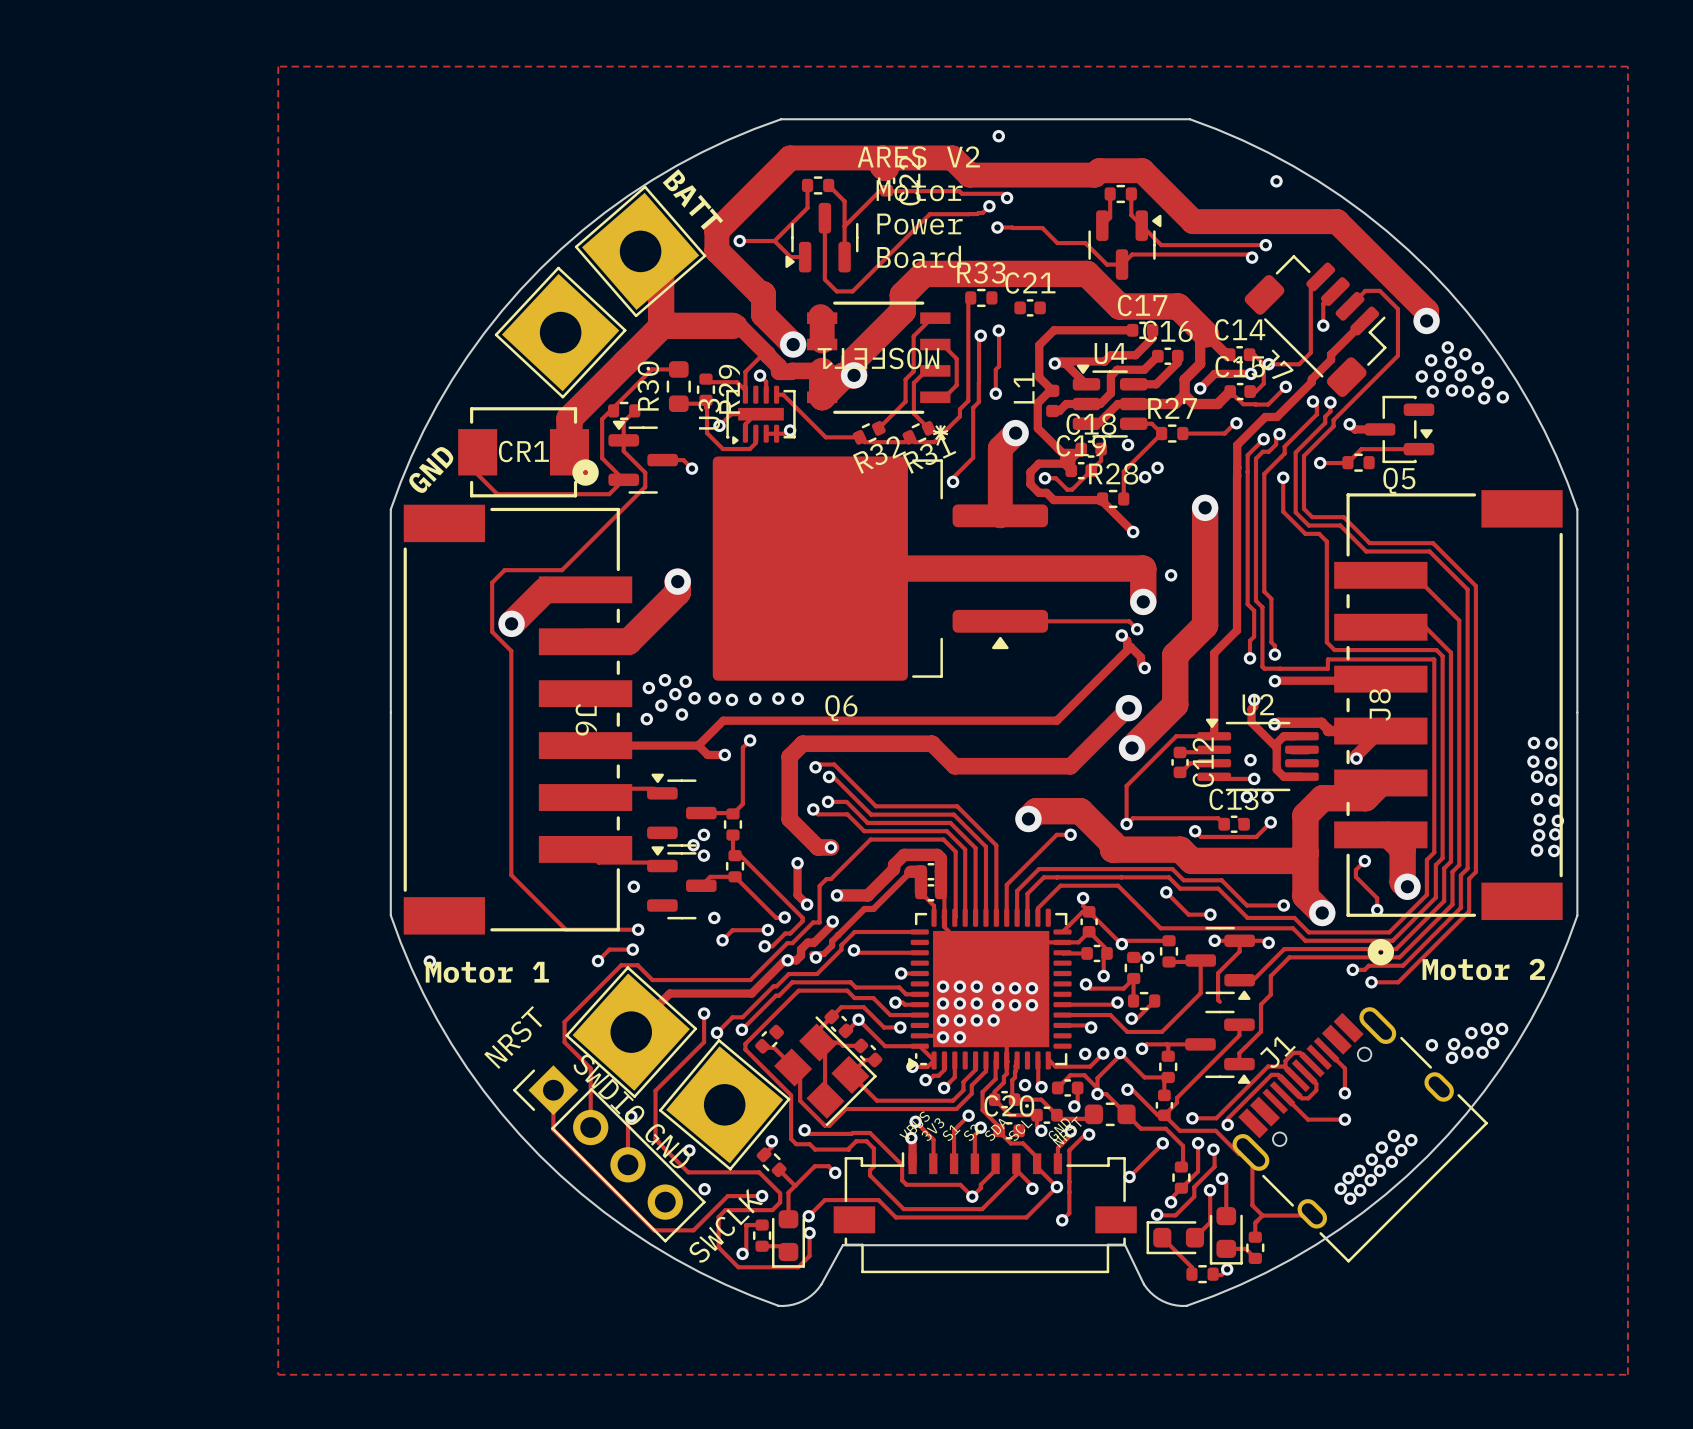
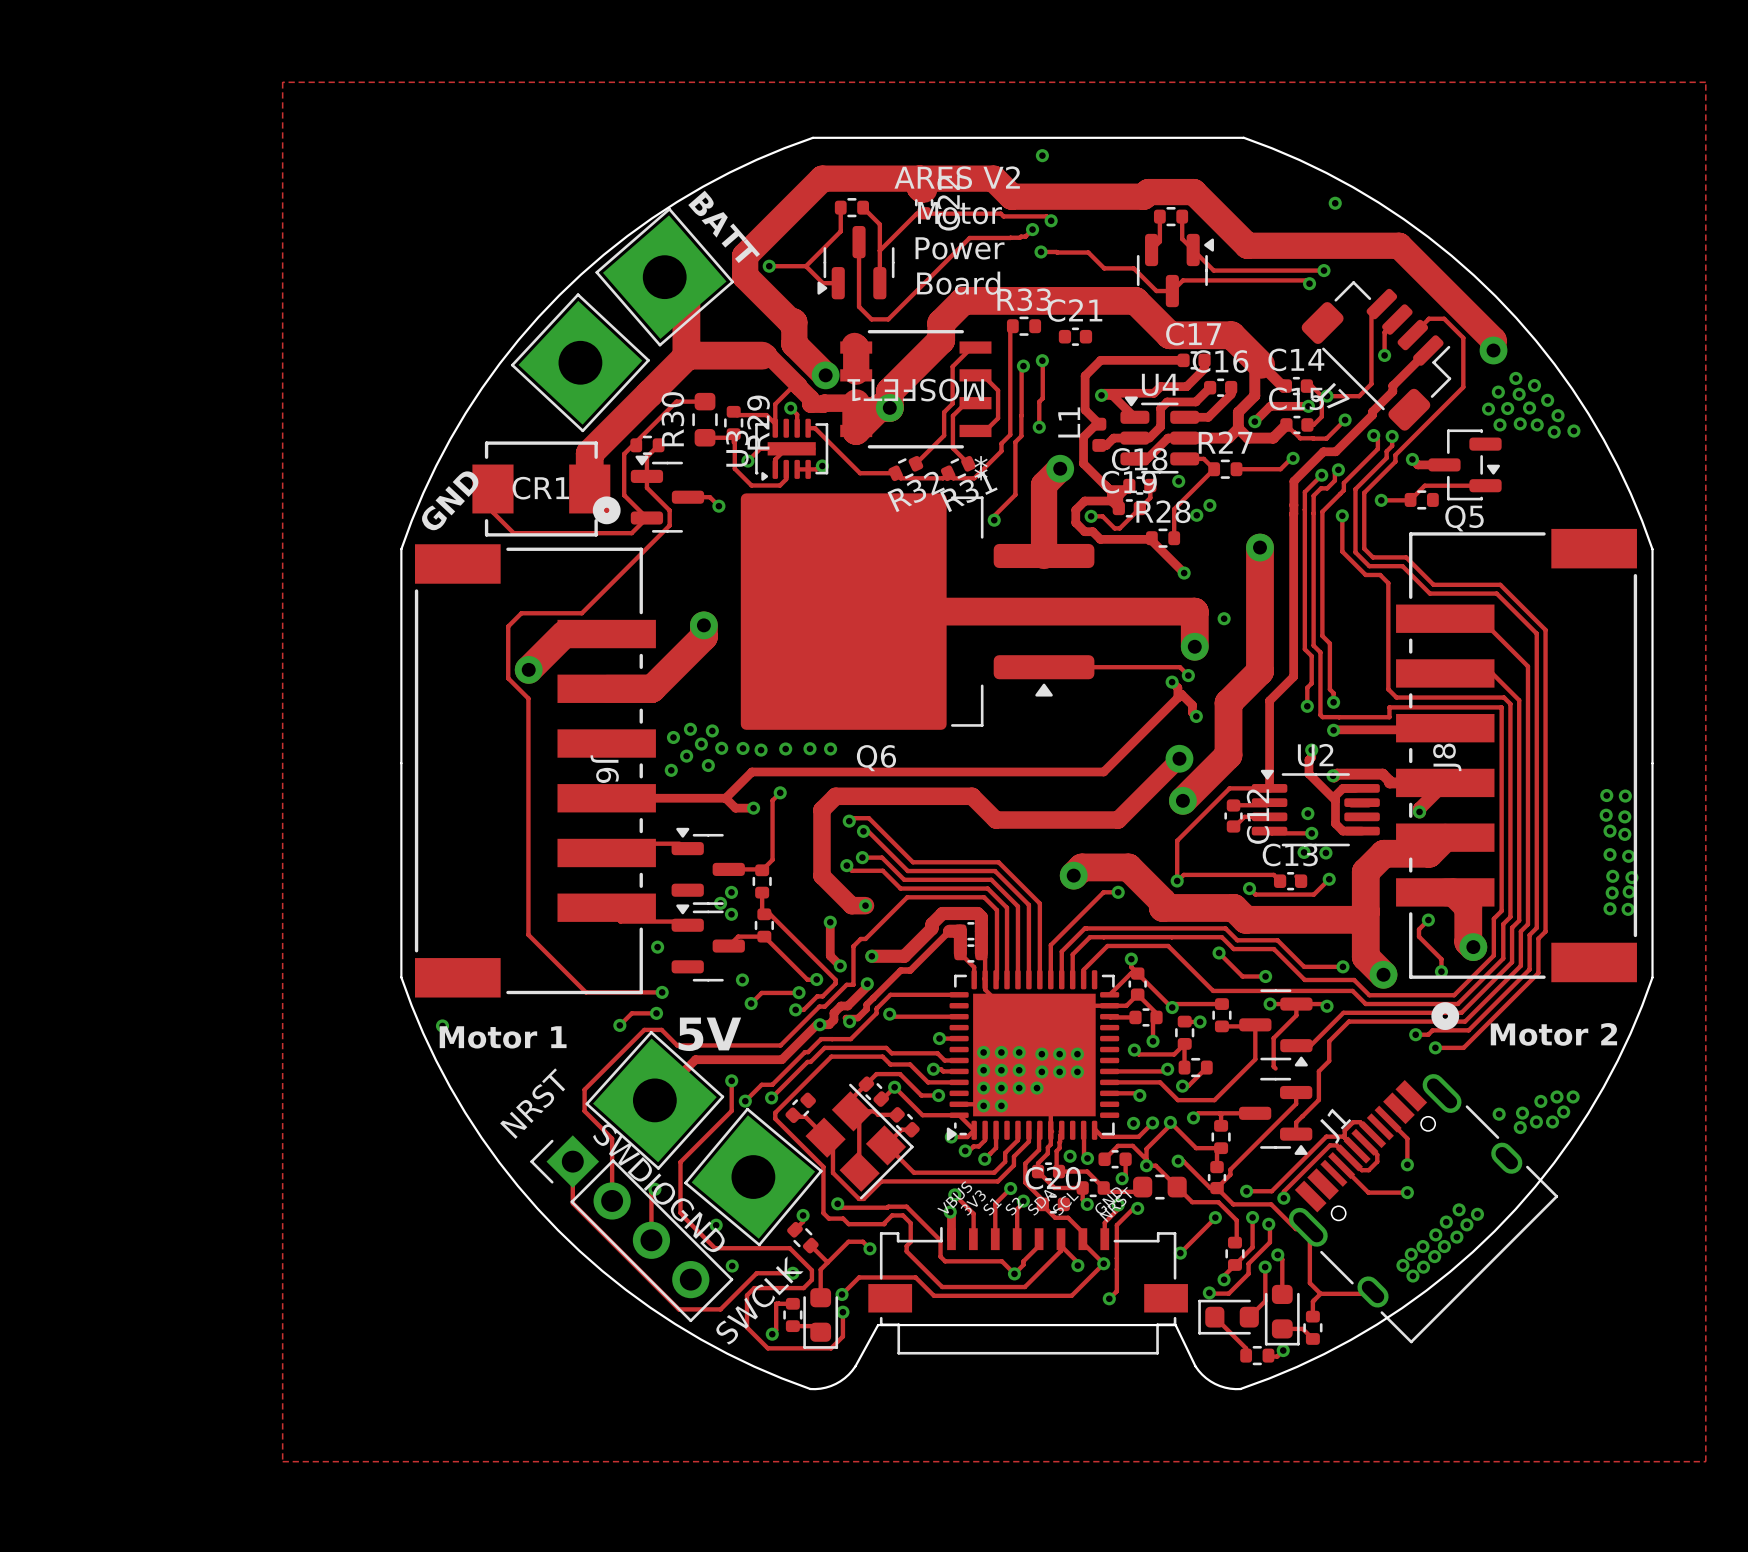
text: none -> 5V (709, 1034)

